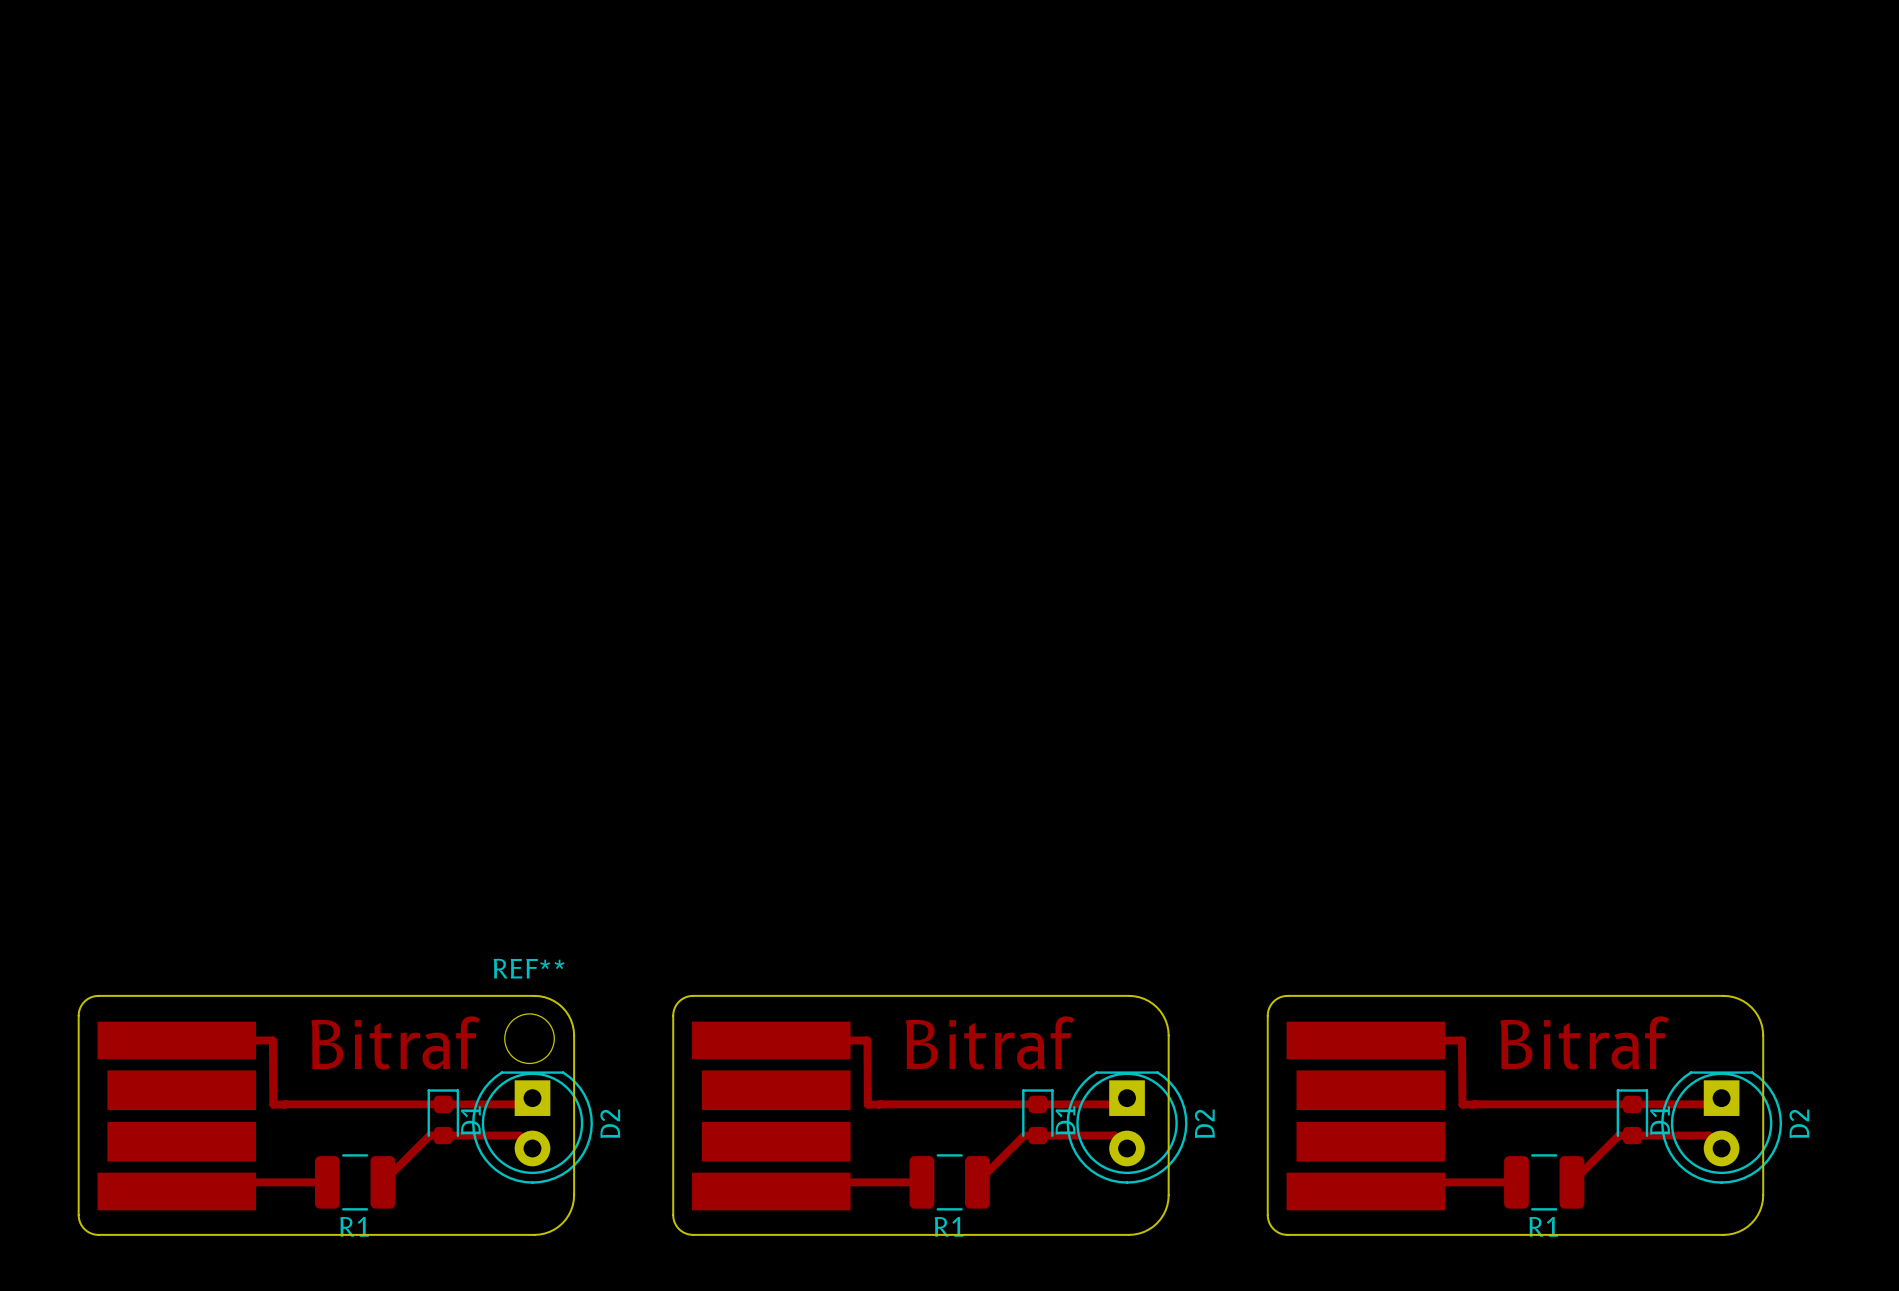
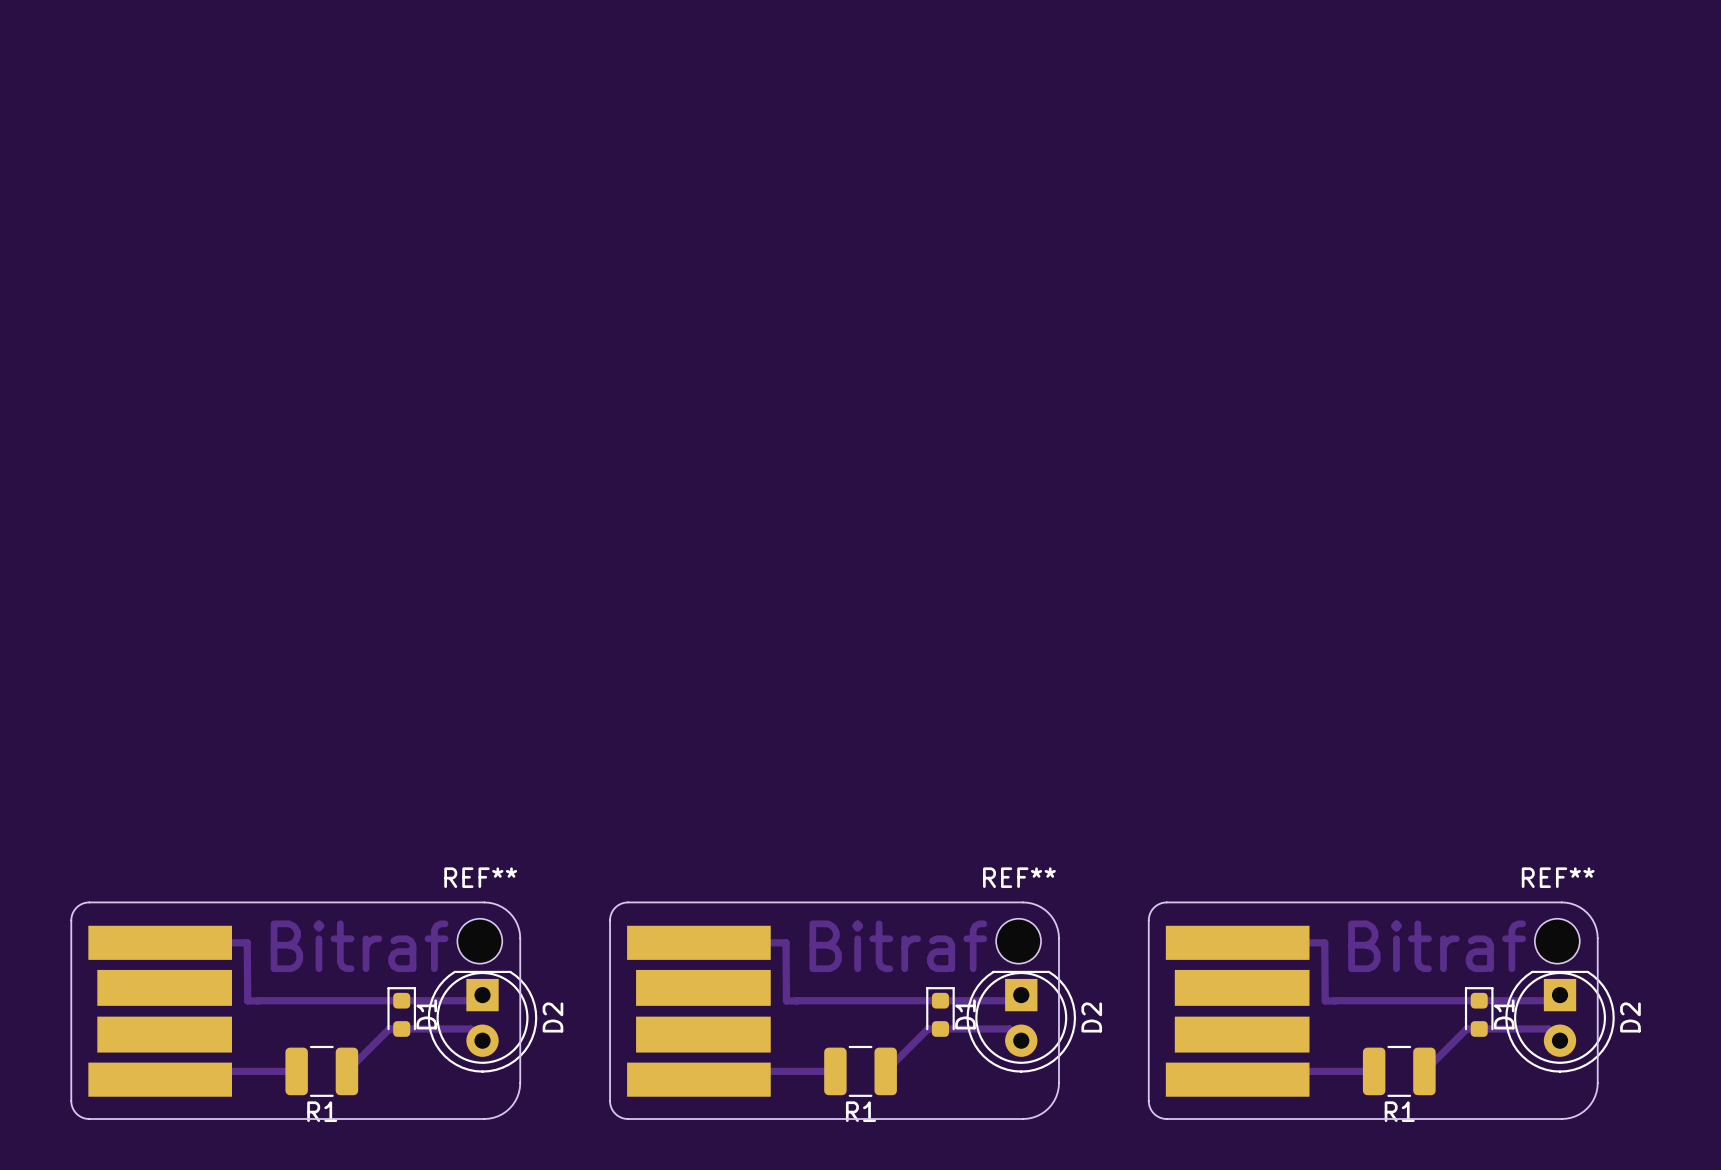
REF**: none -> (1018, 941)
REF**: none -> (1557, 941)

